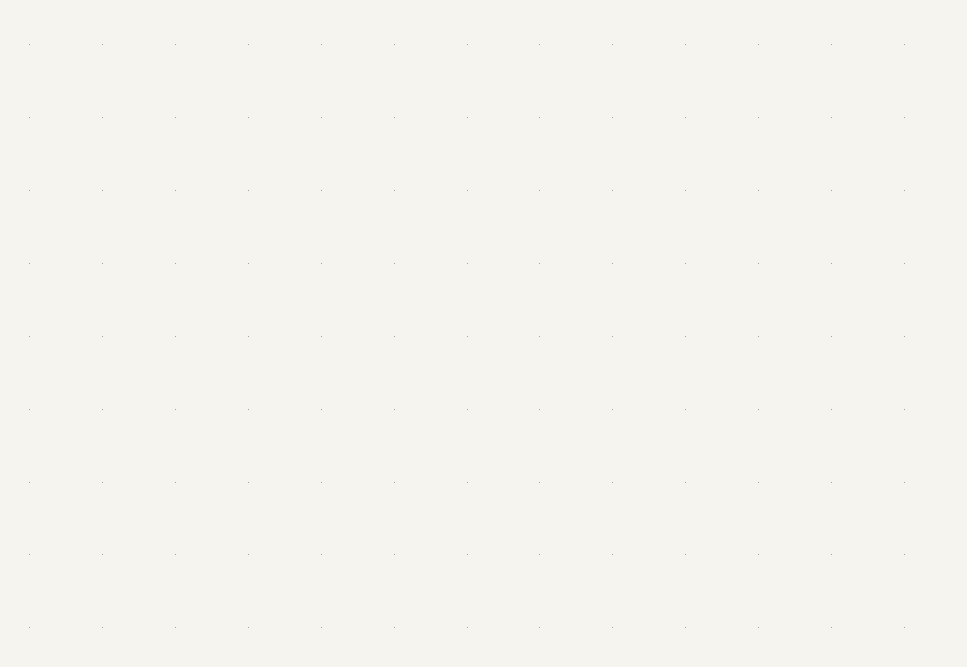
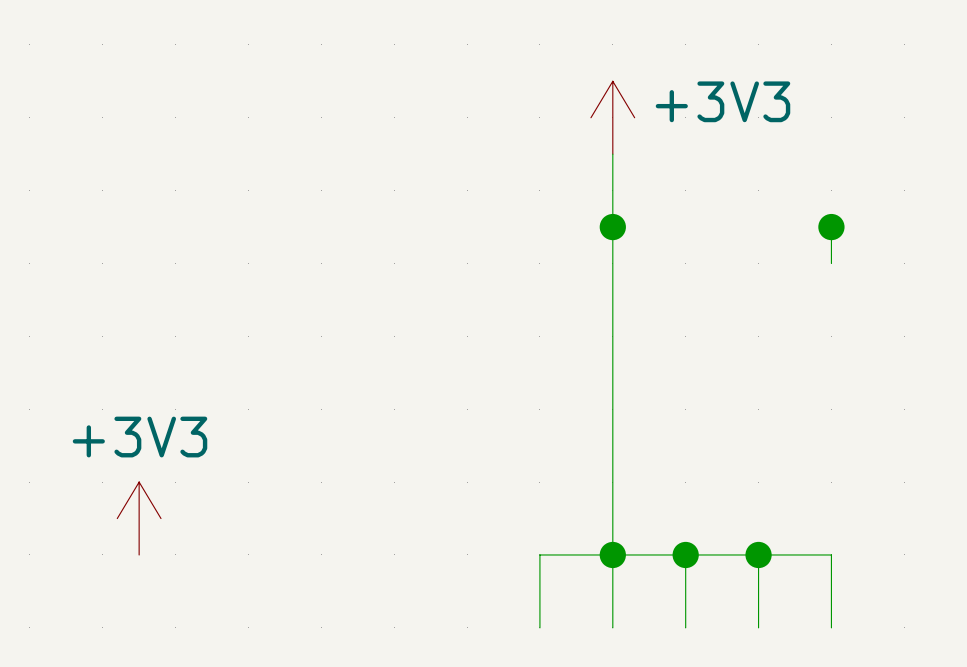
power symbol: none -> +3V3 (612, 117)
wire: none -> (612, 154) (612, 627)
junction: none -> (612, 227)
wire: none -> (831, 227) (831, 263)
junction: none -> (831, 227)
power symbol: none -> +3V3 (139, 518)
junction: none -> (612, 554)
wire: none -> (685, 554) (685, 627)
junction: none -> (685, 554)
wire: none -> (758, 554) (758, 627)
junction: none -> (758, 554)
wire: none -> (539, 627) (539, 554) (831, 554) (831, 627)

